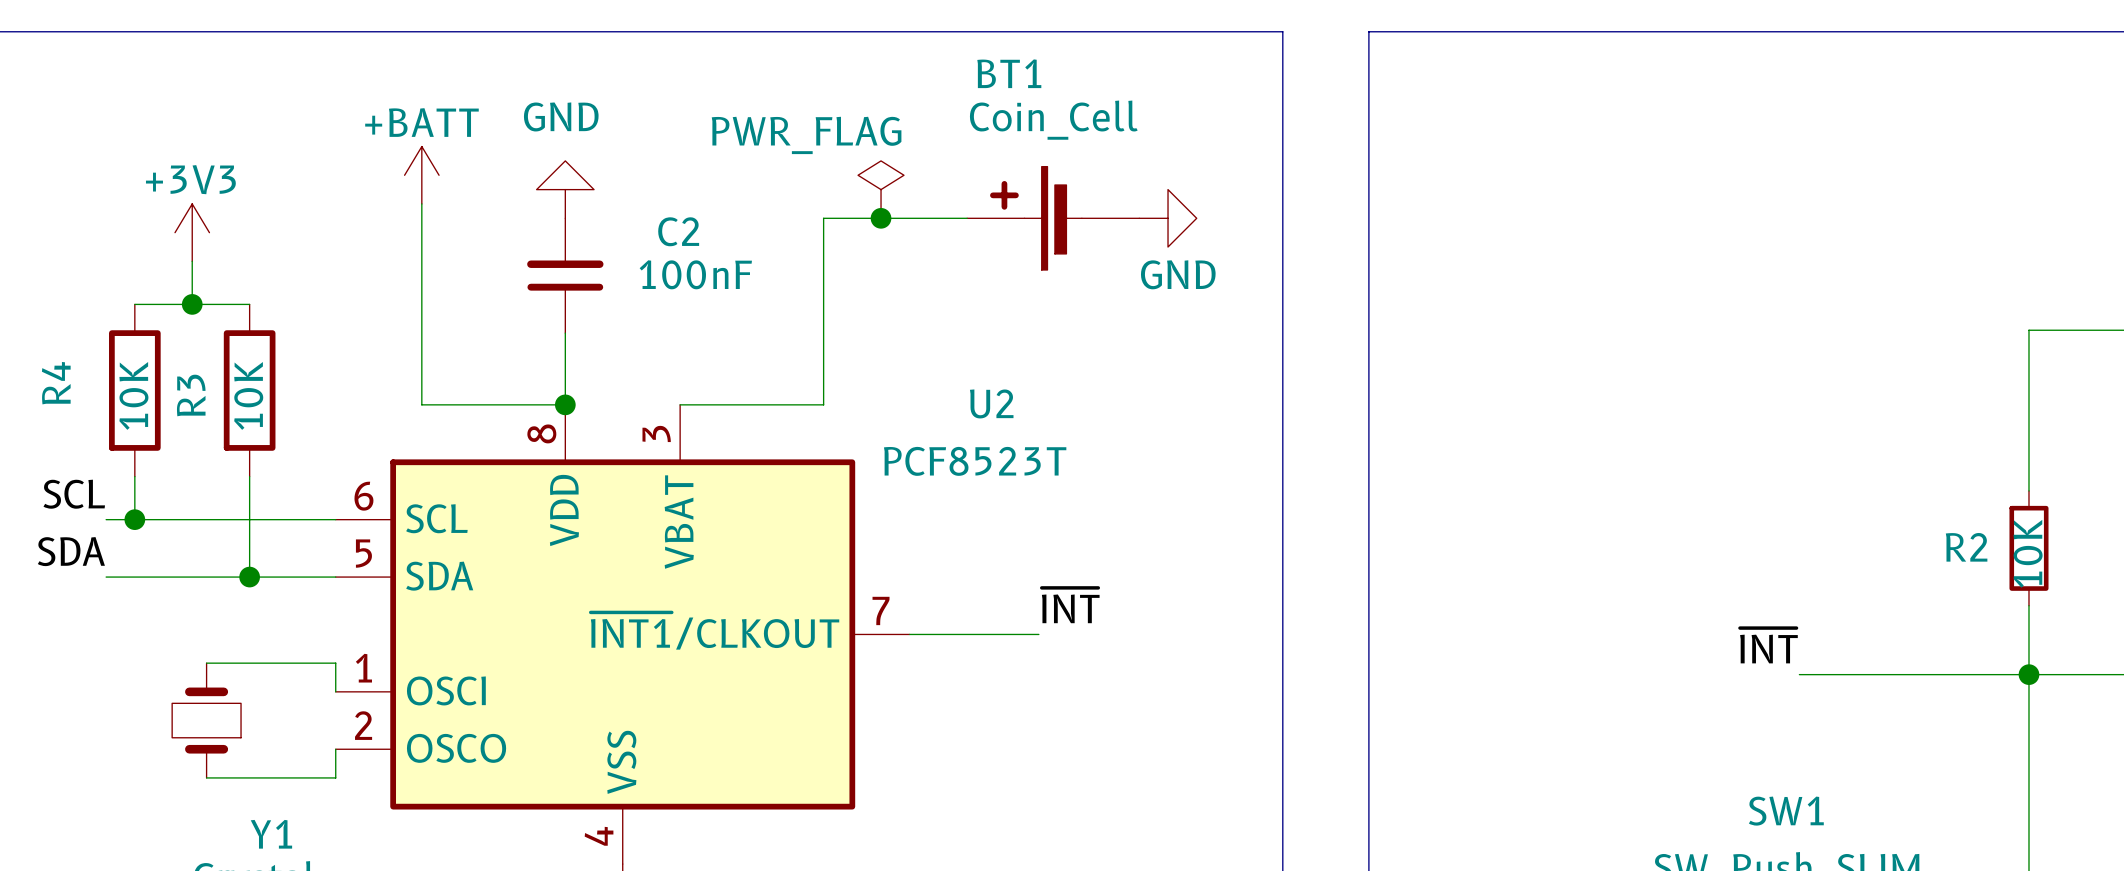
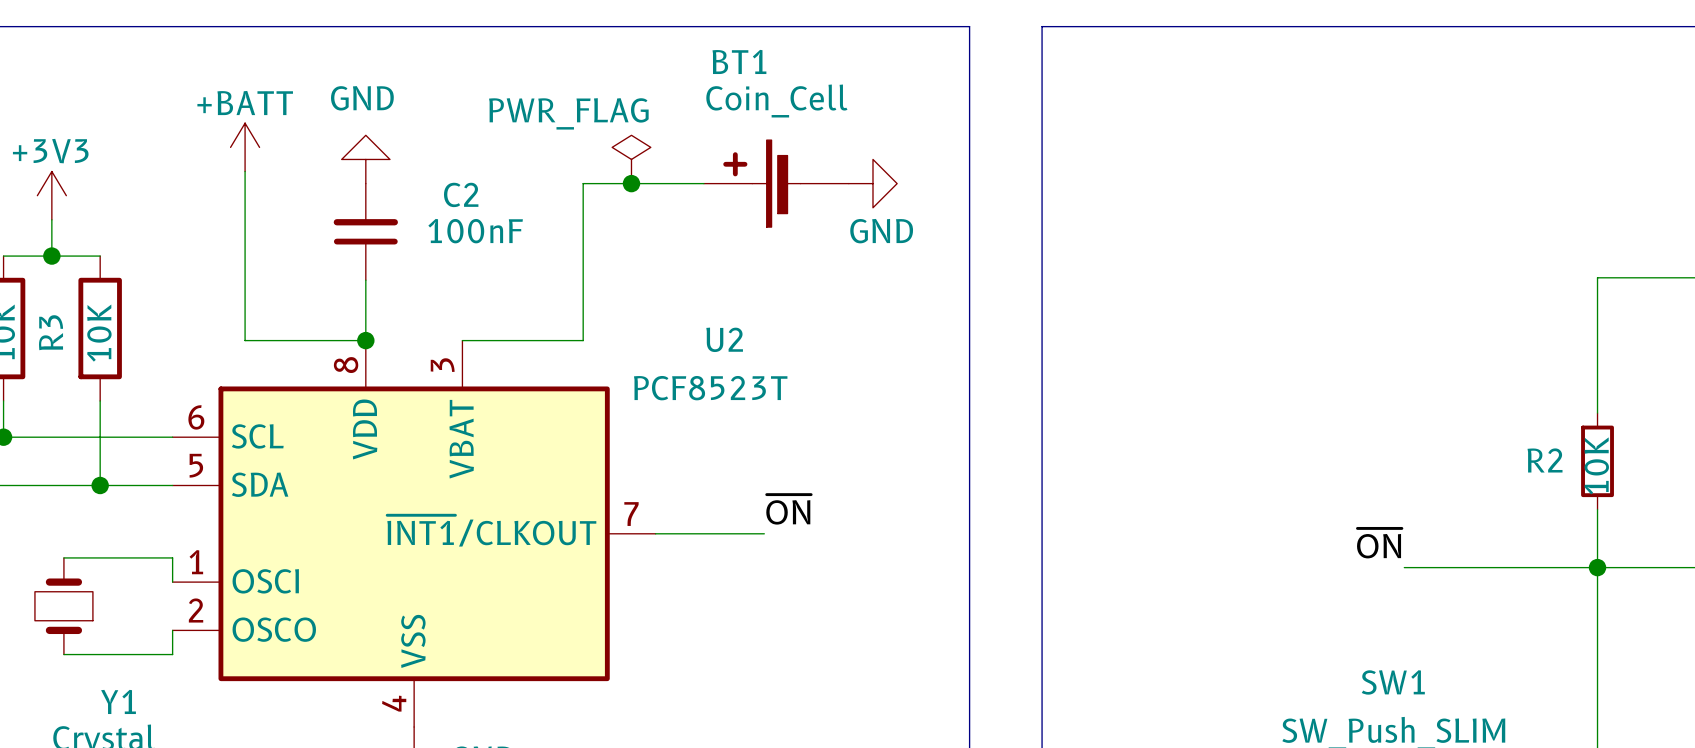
label: ~{INT} (1070, 605) -> ~{ON} (788, 509)
label: ~{INT} (1768, 645) -> ~{ON} (1379, 543)

